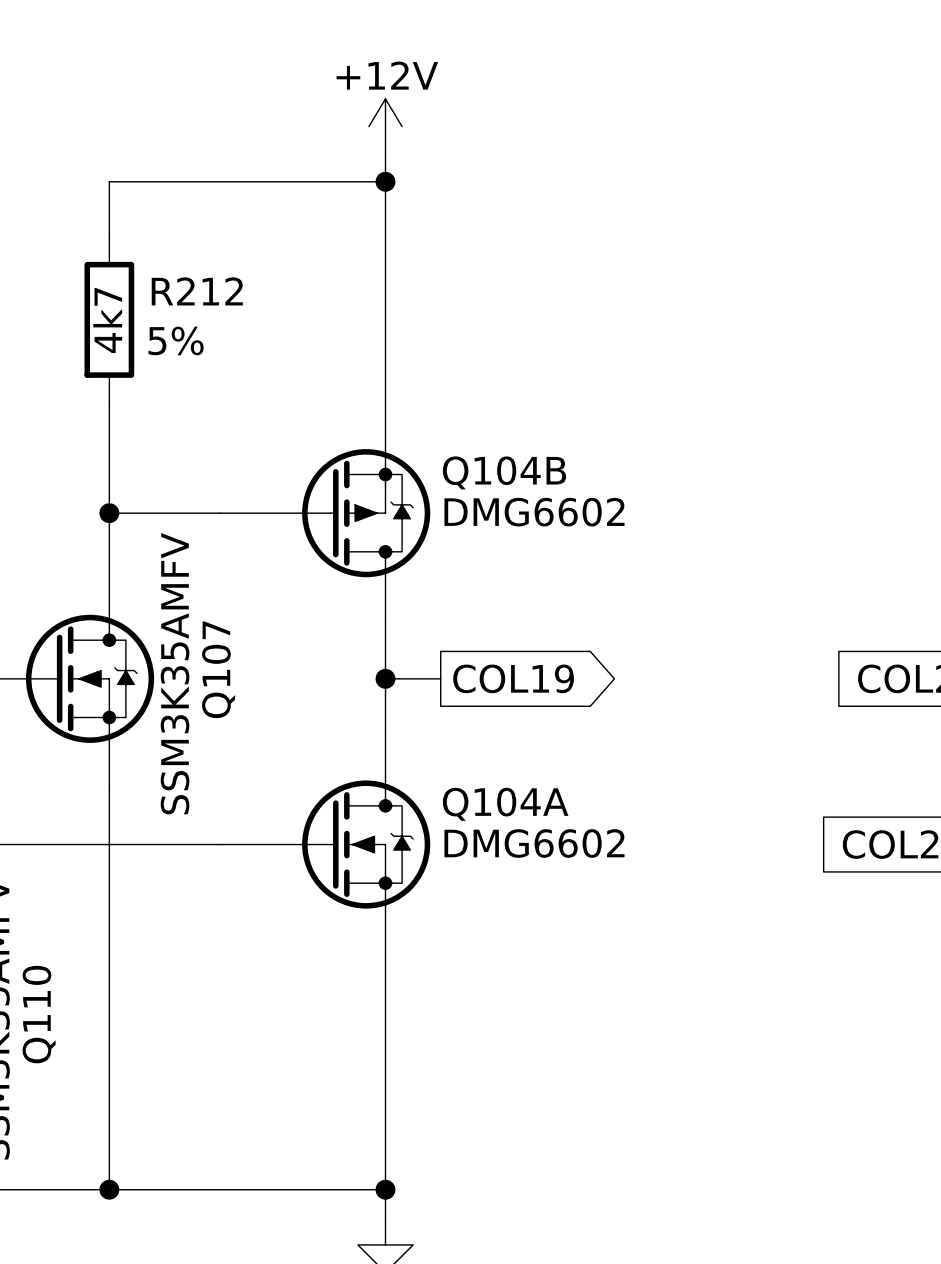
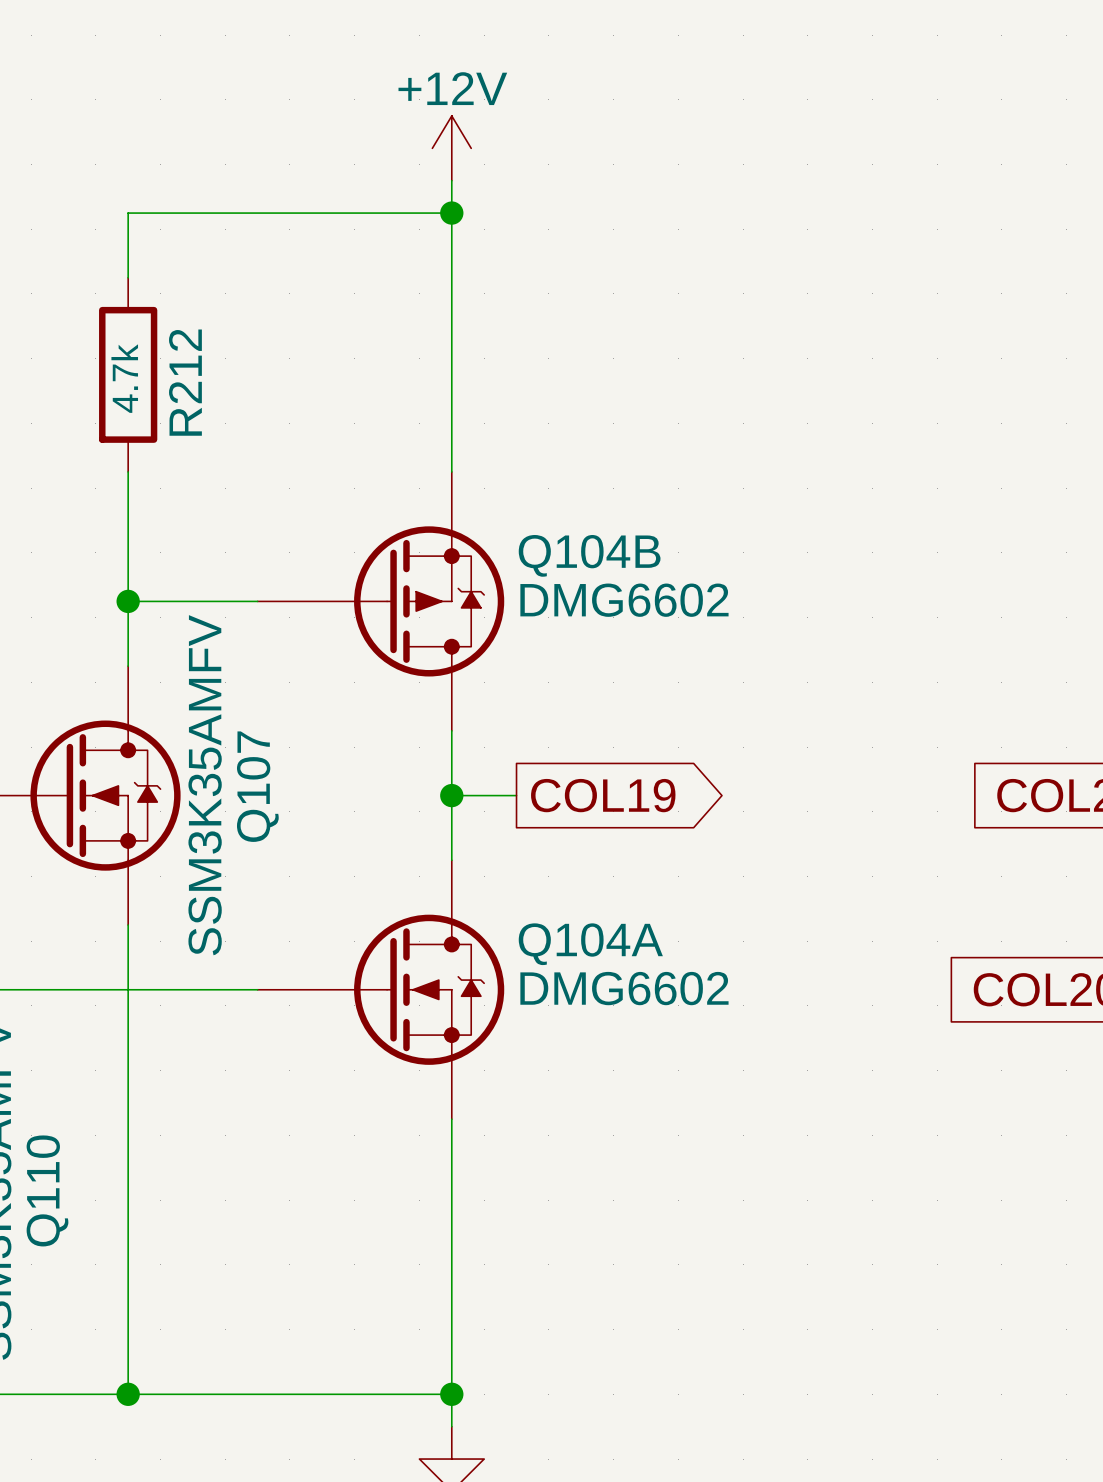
R212 name rotation: 0° (197, 291) -> 90° counterclockwise (185, 382)
R212 text: none -> 4.7k (124, 378)
R212 text: 4k7 (107, 320) -> none
R212 text: 5% (176, 340) -> none

